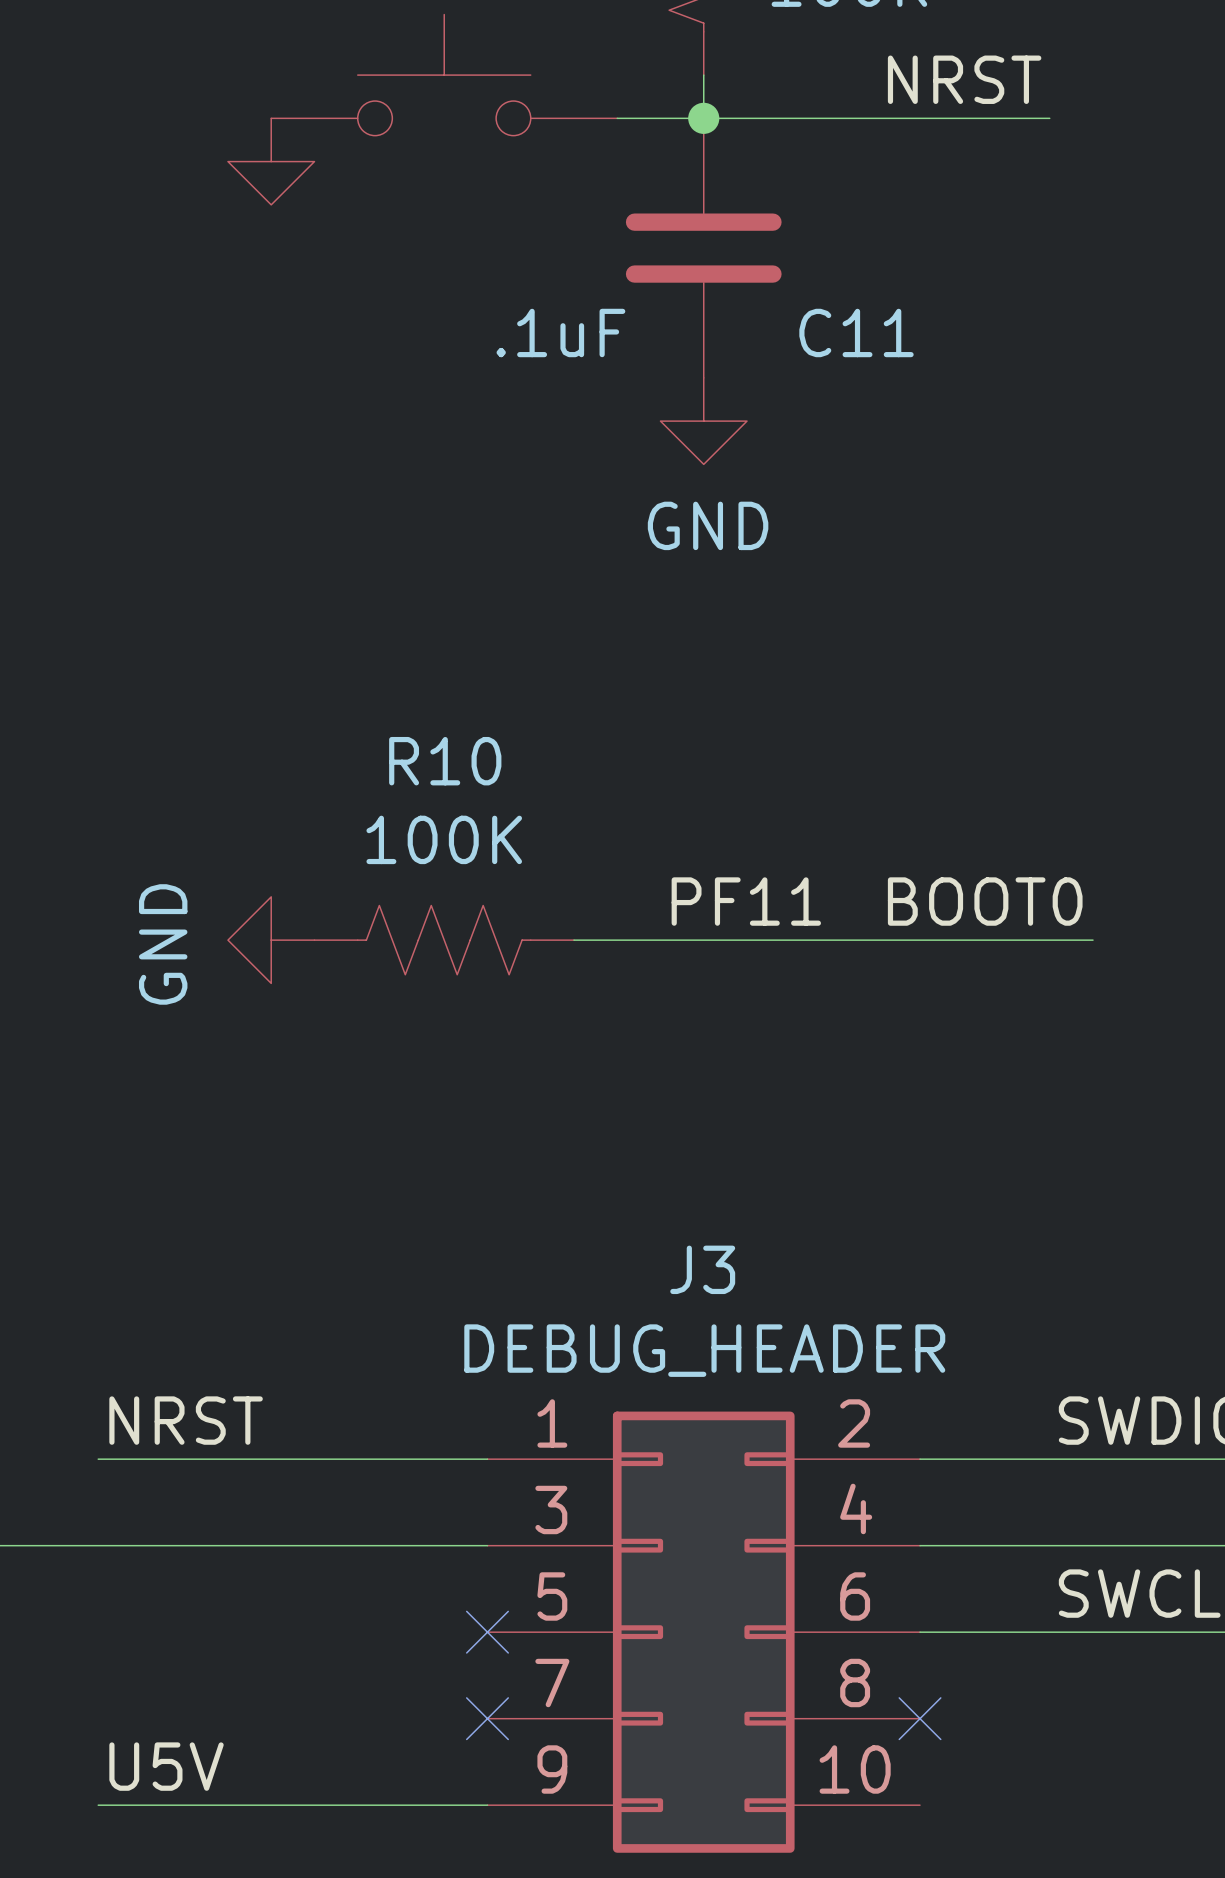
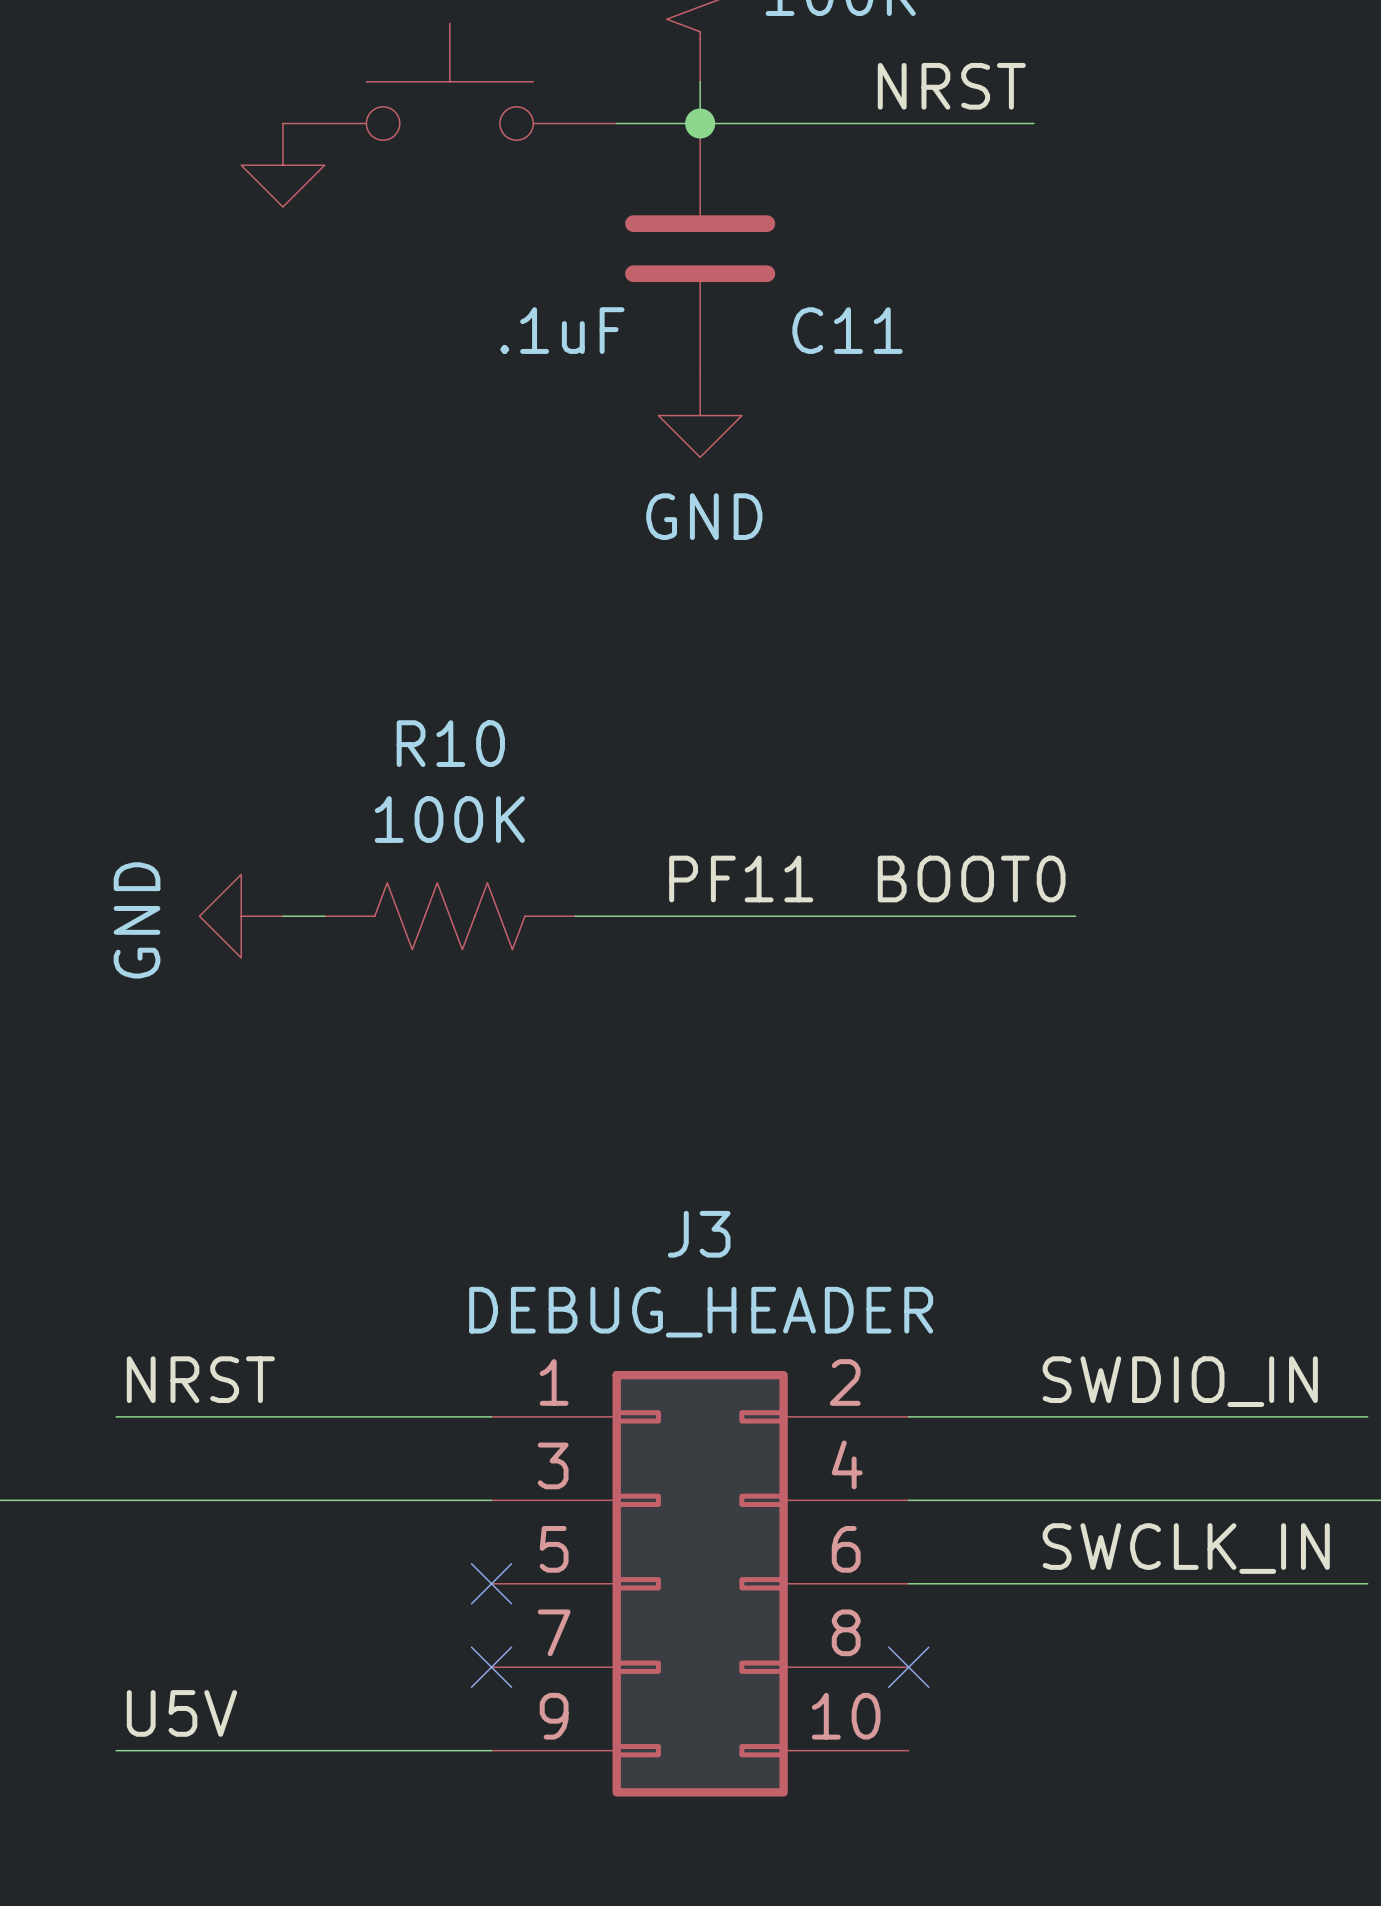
power symbol position: GND (271, 940) -> GND (241, 916)

